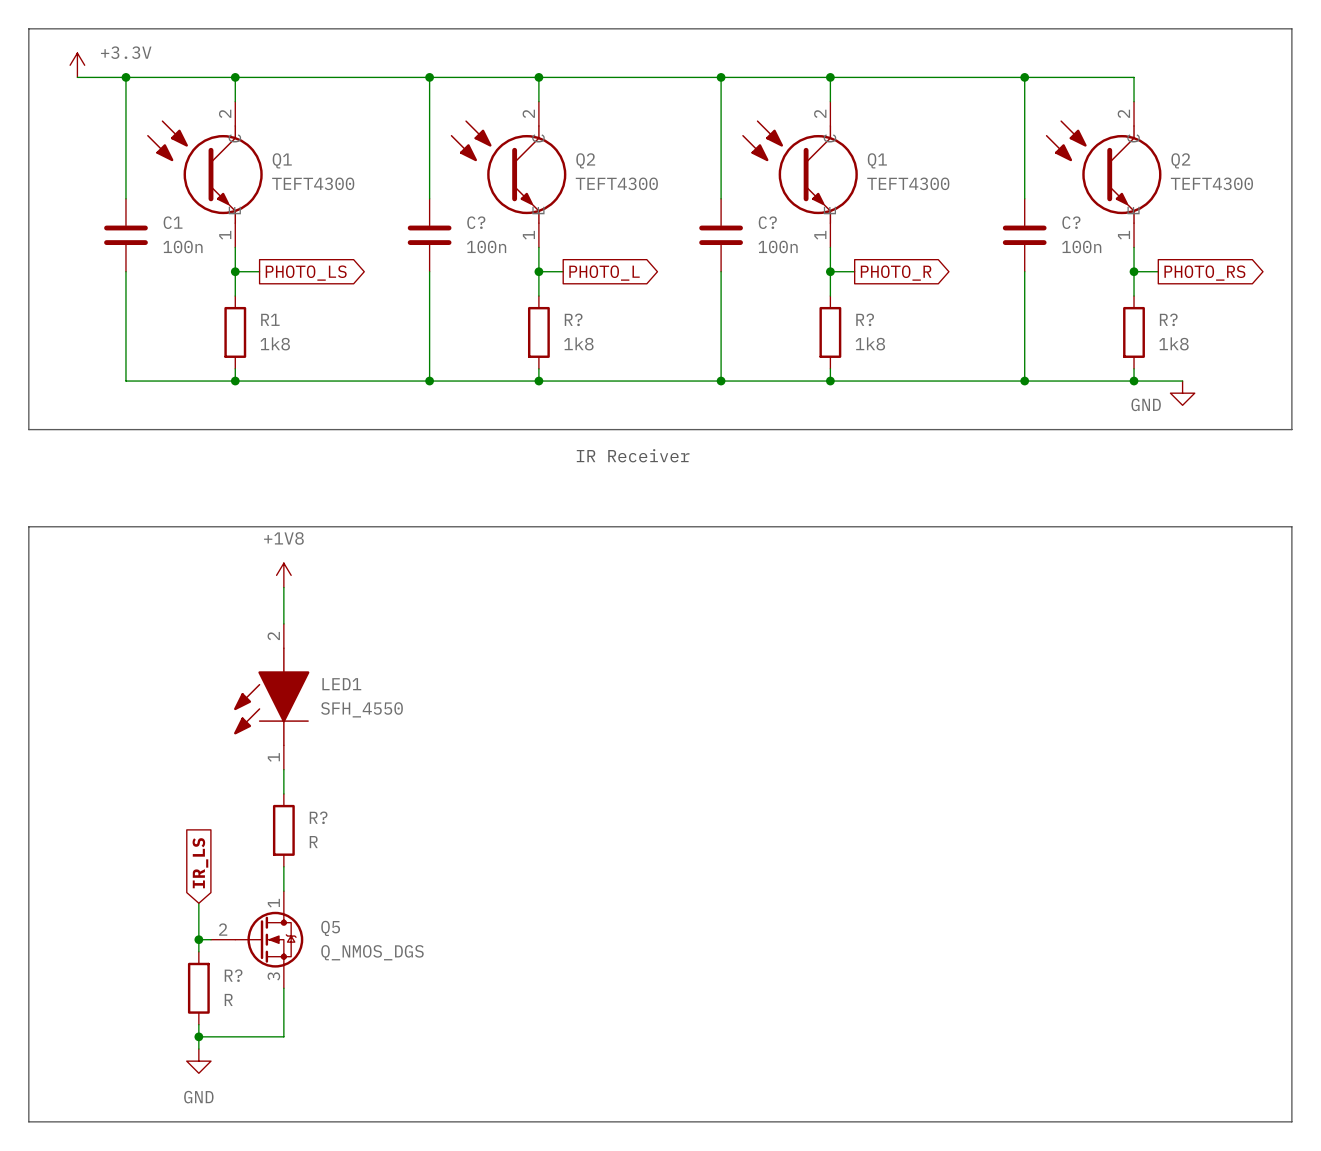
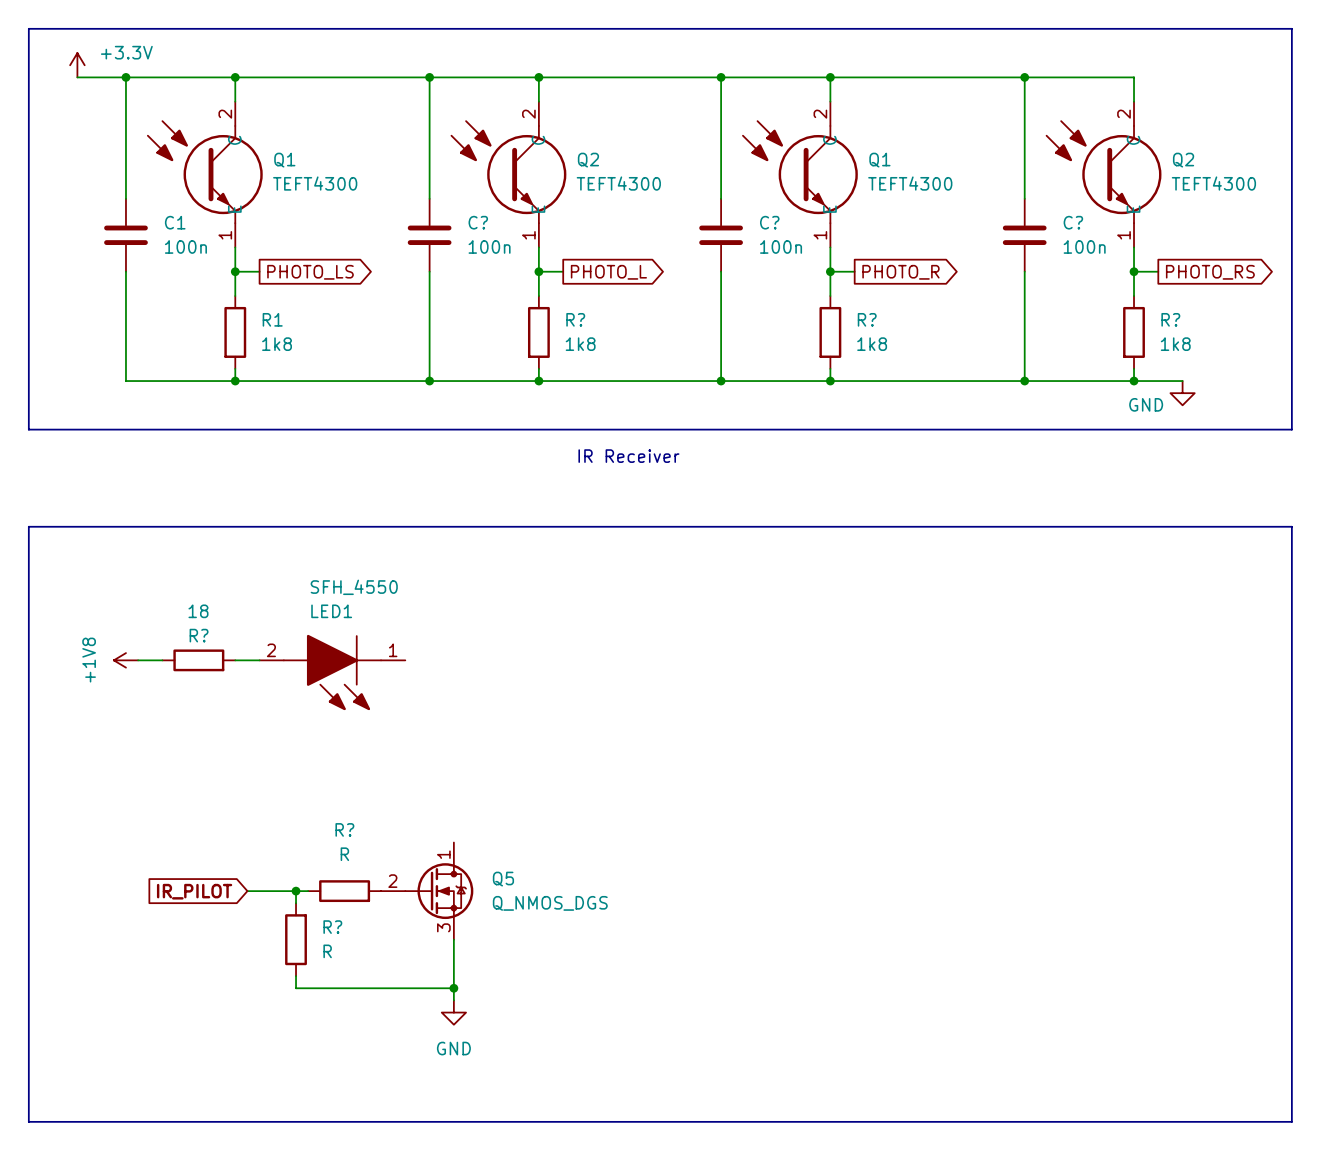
power symbol rotation: 0° (283, 575) -> 90° counterclockwise (125, 660)
power symbol position: +1V8 (283, 575) -> +1V8 (125, 660)
wire: (283, 587) (283, 623) -> none
wire: none -> (138, 660) (162, 660)
R?: none -> 18 (198, 660)
wire: none -> (235, 660) (259, 660)
LED1 name position: LED1 (341, 684) -> LED1 (331, 611)
LED1 rotation: 0° (271, 696) -> 90° counterclockwise (332, 672)
LED1 value position: SFH_4550 (361, 709) -> SFH_4550 (354, 587)
wire: (283, 769) (283, 793) -> none
R?: R (283, 830) -> none
global label: IR_LS (200, 863) -> IR_PILOT (194, 891)
wire: (283, 866) (283, 891) -> none
wire: none -> (247, 891) (308, 891)
wire: none -> (296, 891) (296, 903)
junction: none -> (296, 891)
R?: none -> R (344, 891)
wire: (198, 903) (198, 951) -> none
wire: (198, 939) (211, 939) -> none
junction: (198, 939) -> none
Q5 position: (257, 939) -> (427, 891)
R?: none -> R (296, 939)
wire: none -> (453, 939) (453, 1000)
wire: none -> (296, 976) (296, 988) (453, 988)
R?: R (198, 988) -> none
wire: (283, 988) (283, 1036) (198, 1036) -> none
junction: none -> (453, 988)
power symbol: none -> GND (453, 1012)
wire: (198, 1024) (198, 1048) -> none
junction: (198, 1036) -> none
power symbol: GND (198, 1061) -> none

